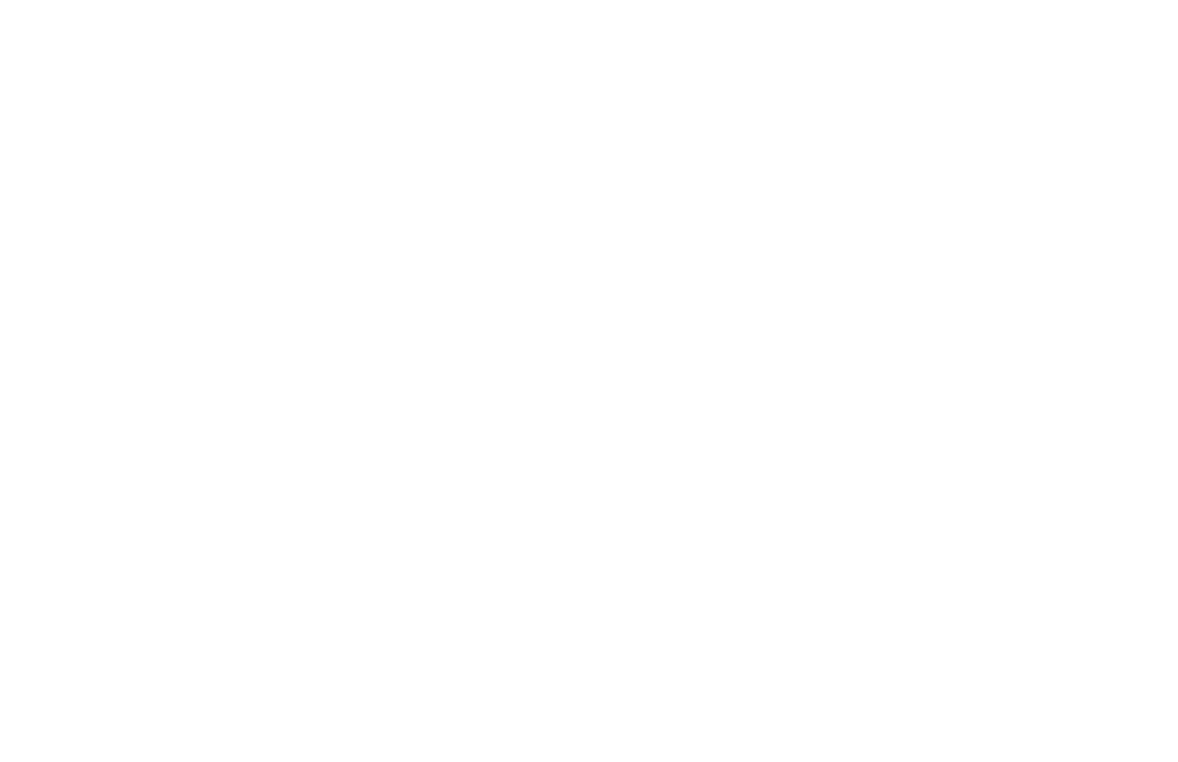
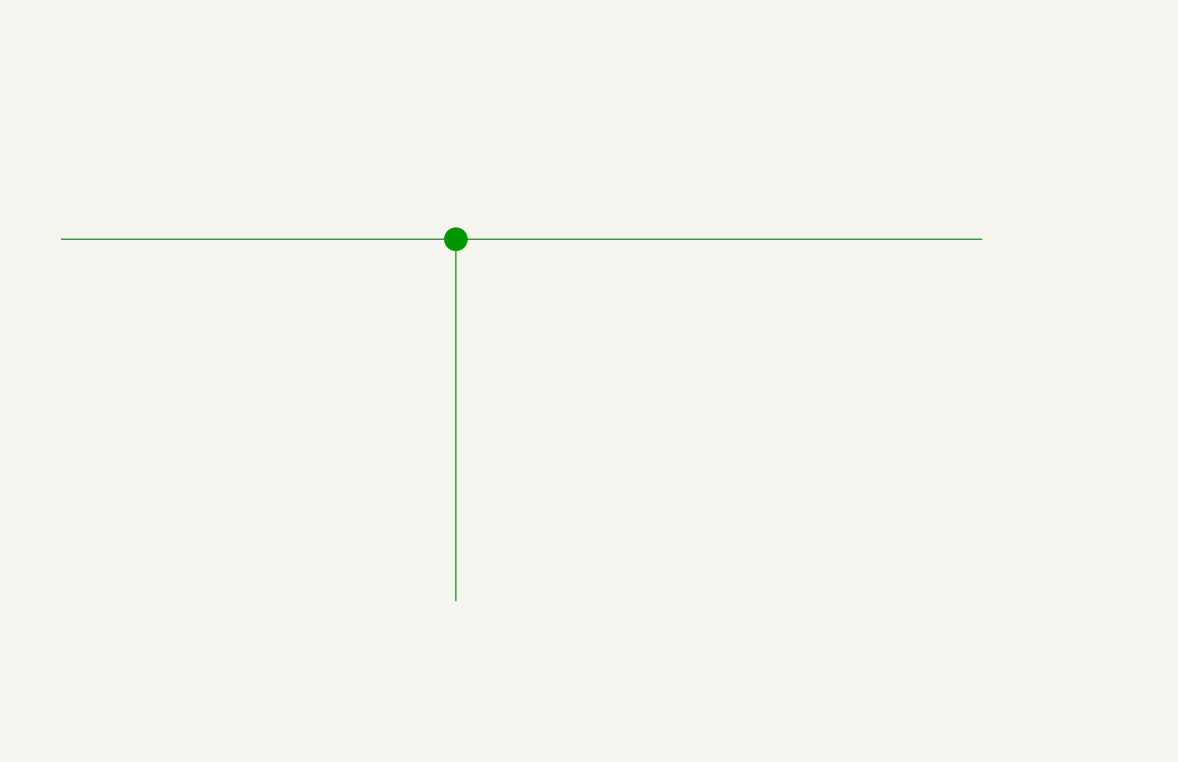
wire: none -> (61, 239) (981, 239)
wire: none -> (455, 239) (455, 600)
junction: none -> (455, 239)

